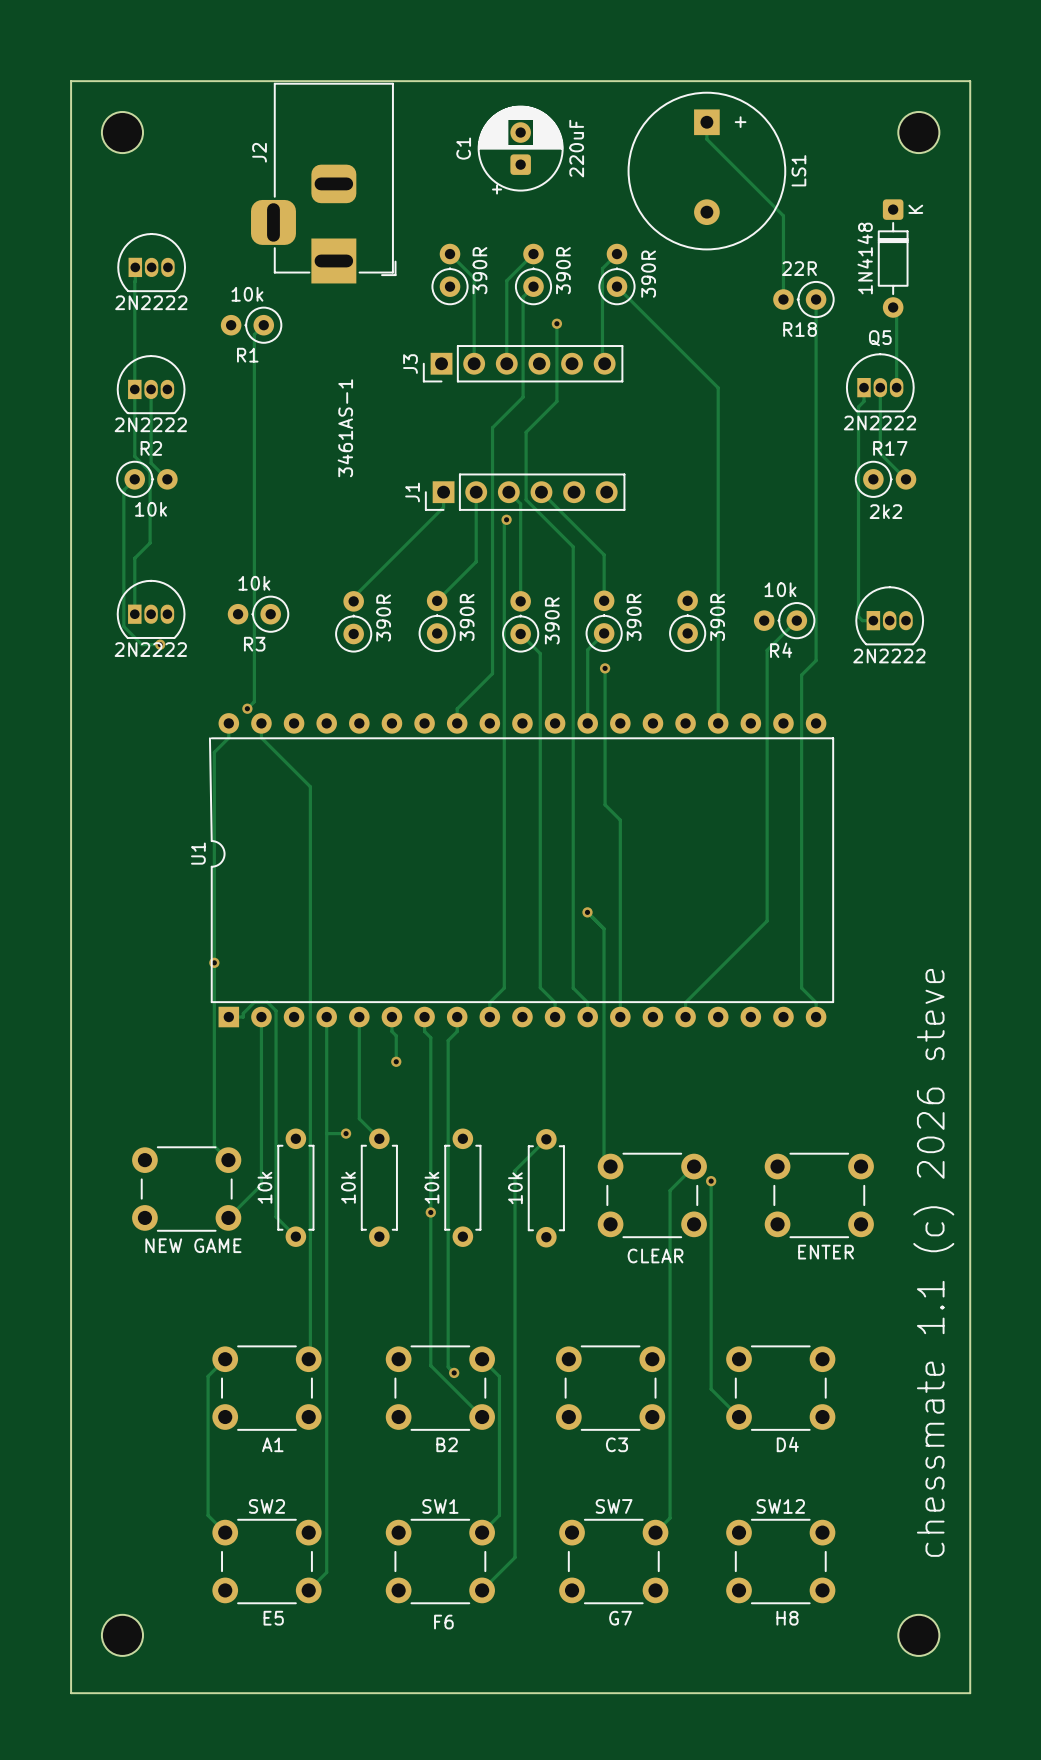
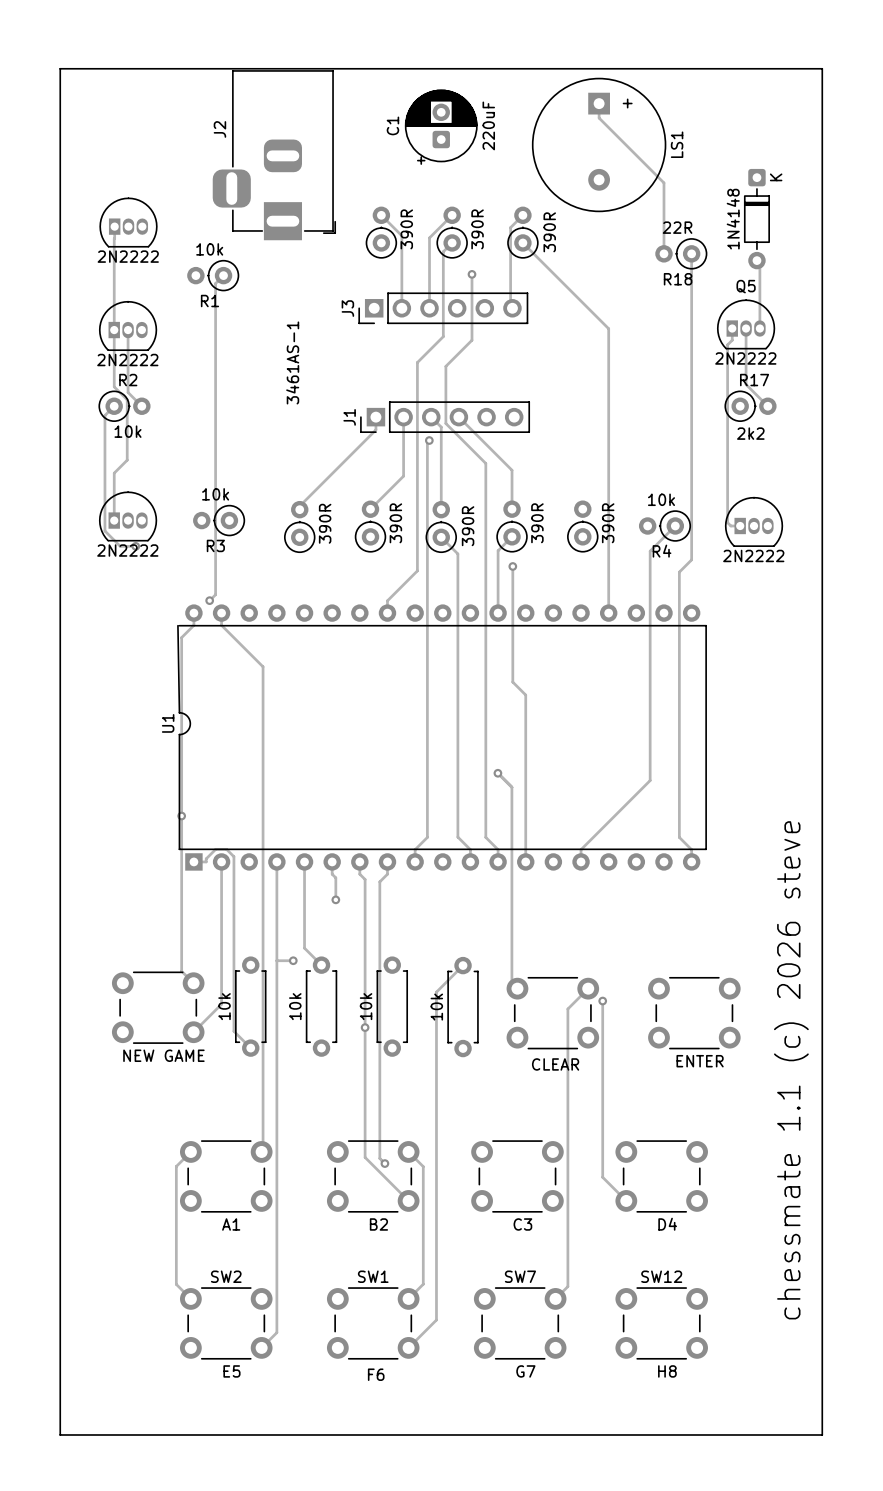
part: (122, 132) -> none
part: (918, 132) -> none
part: (122, 1635) -> none
part: (918, 1635) -> none

